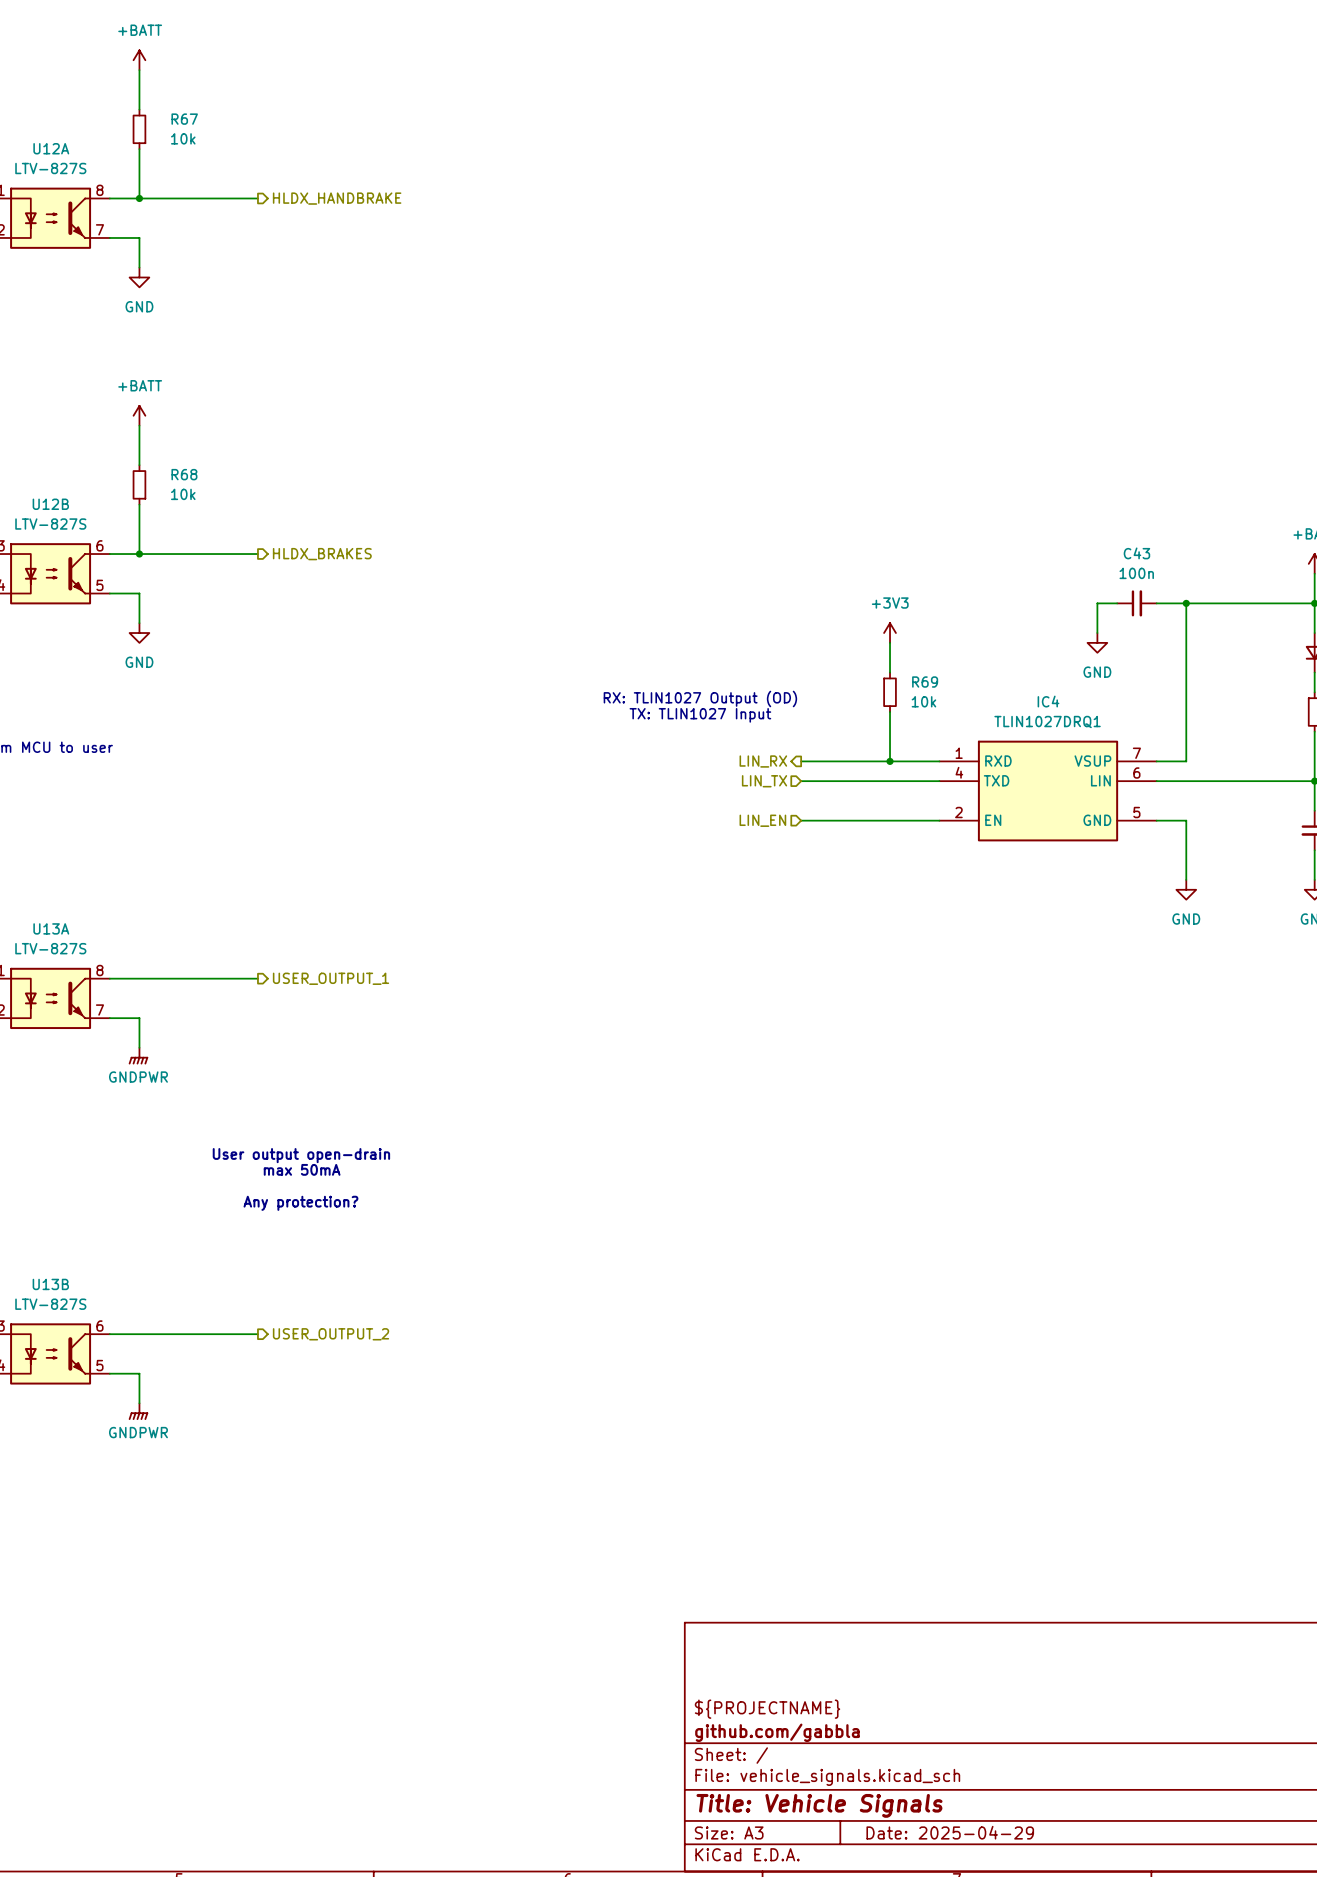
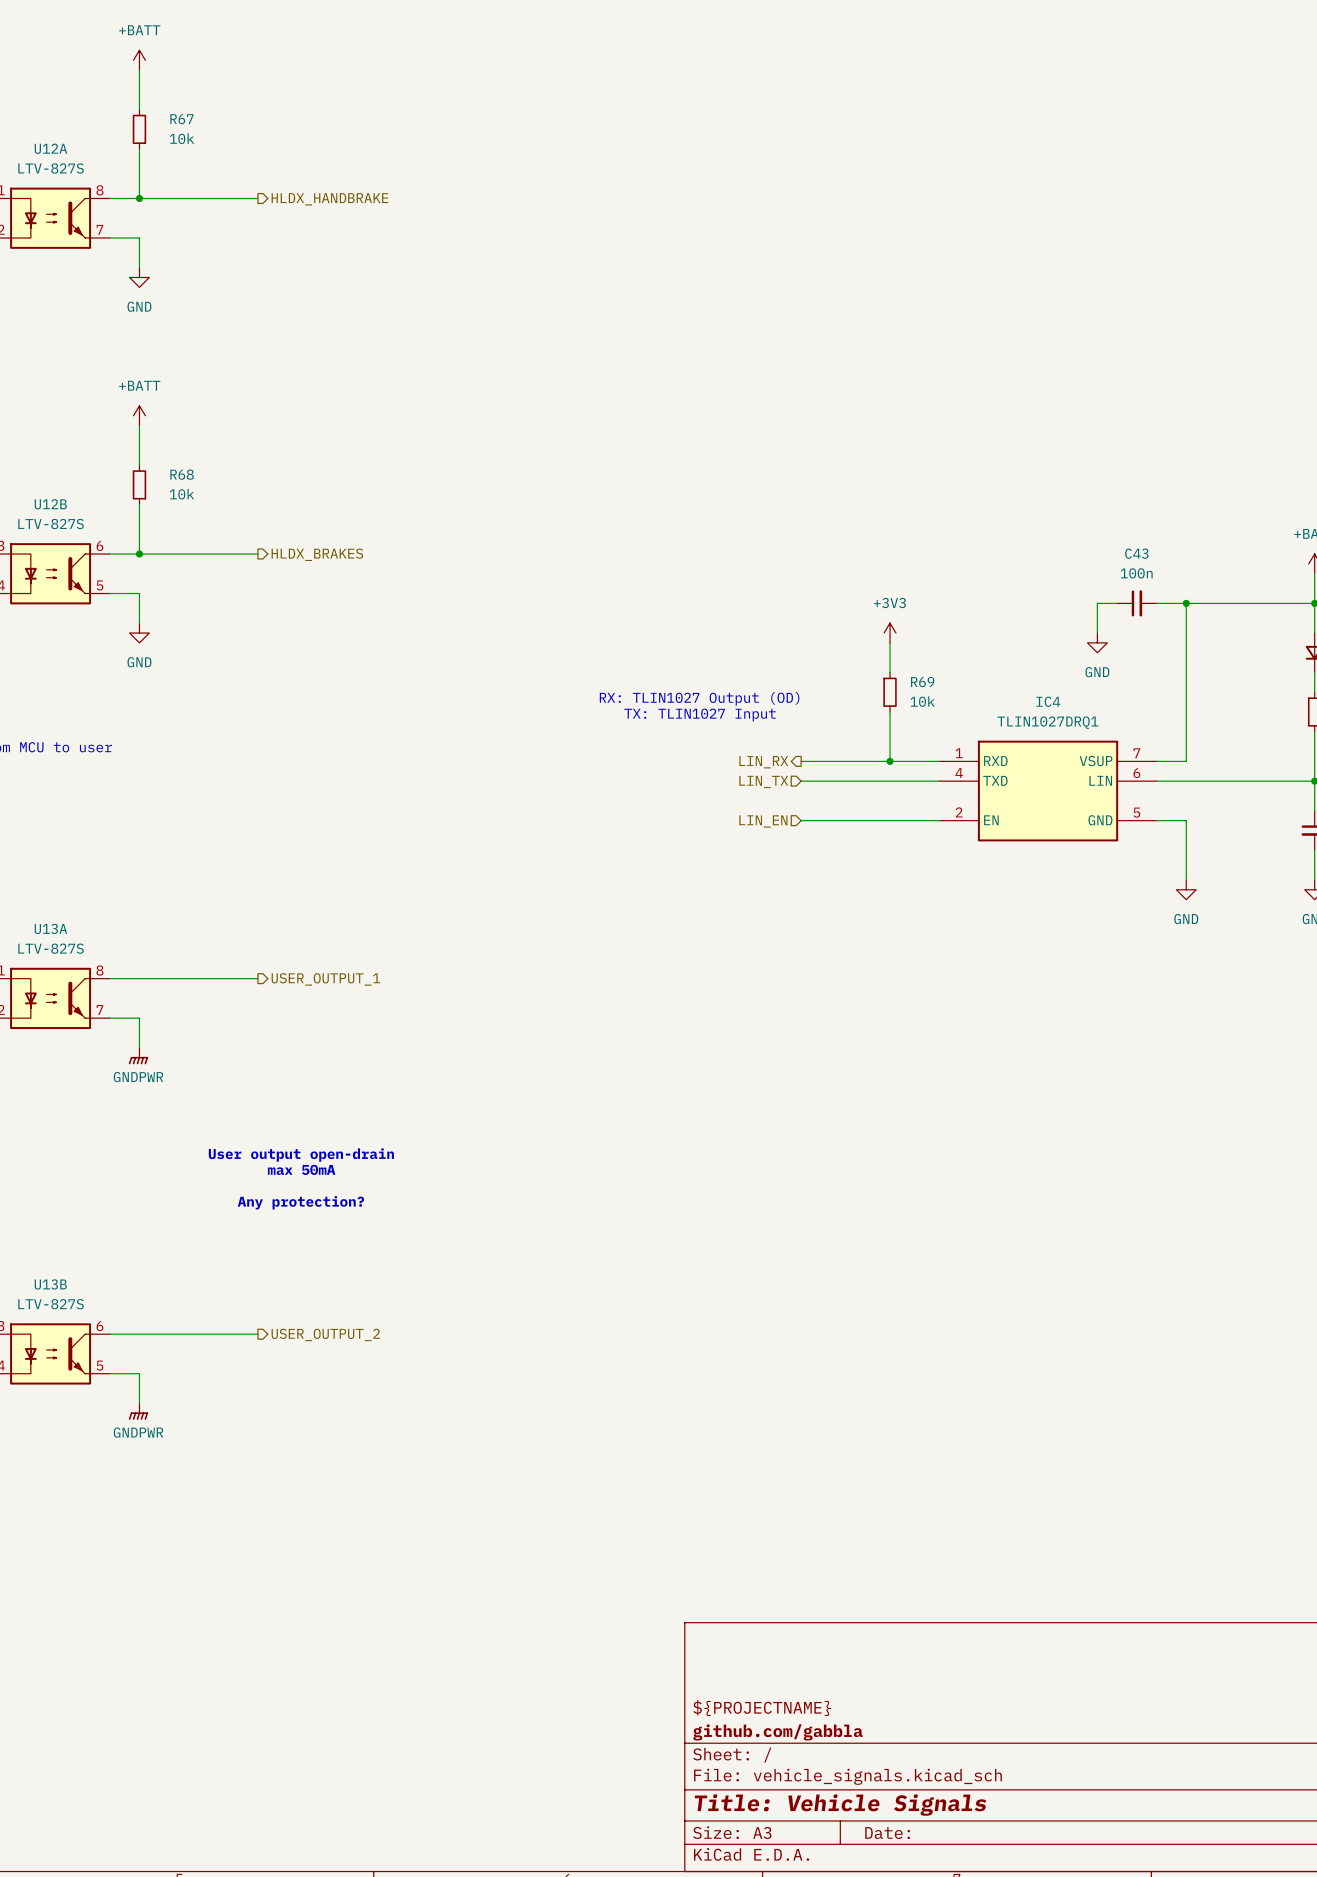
title block: Date: 2025-04-29 (950, 1832) -> Date: (887, 1833)

